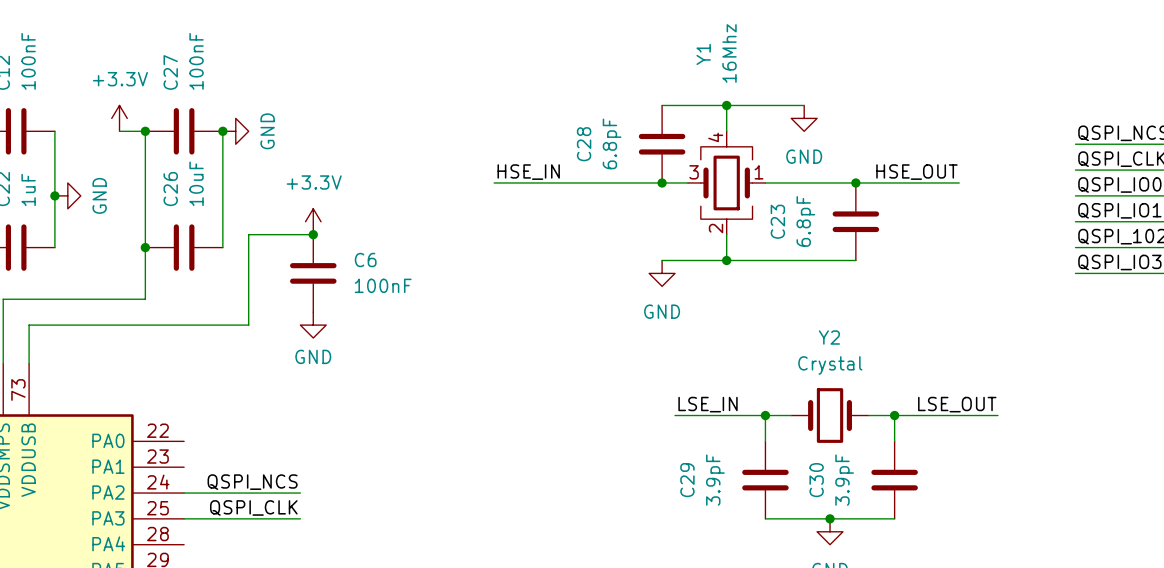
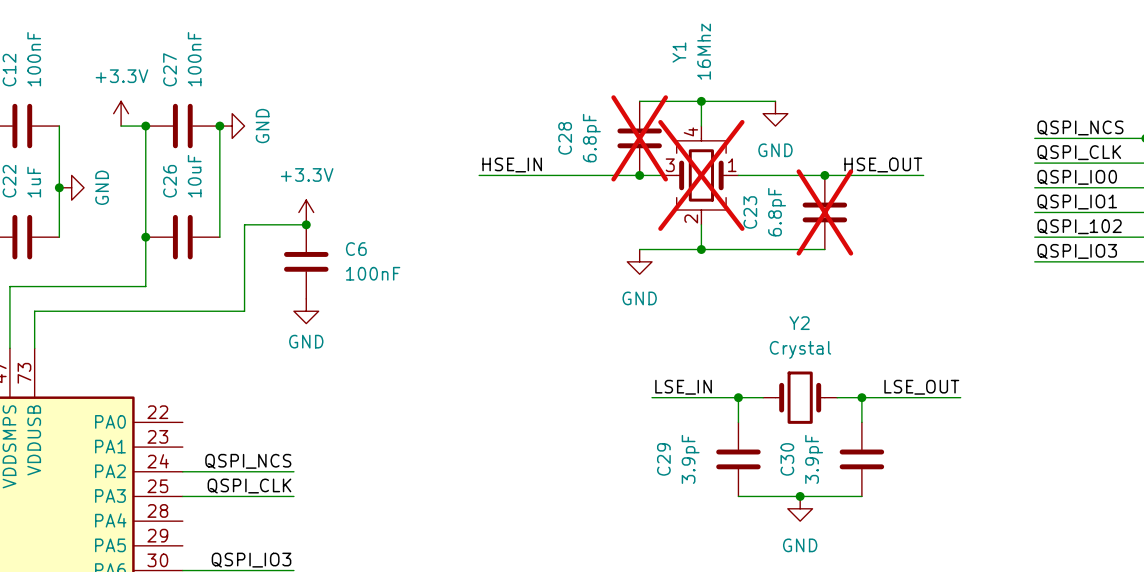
C28 do-not-place cross: none -> (639, 138)
Y1 do-not-place cross: none -> (701, 175)
C23 do-not-place cross: none -> (824, 212)

